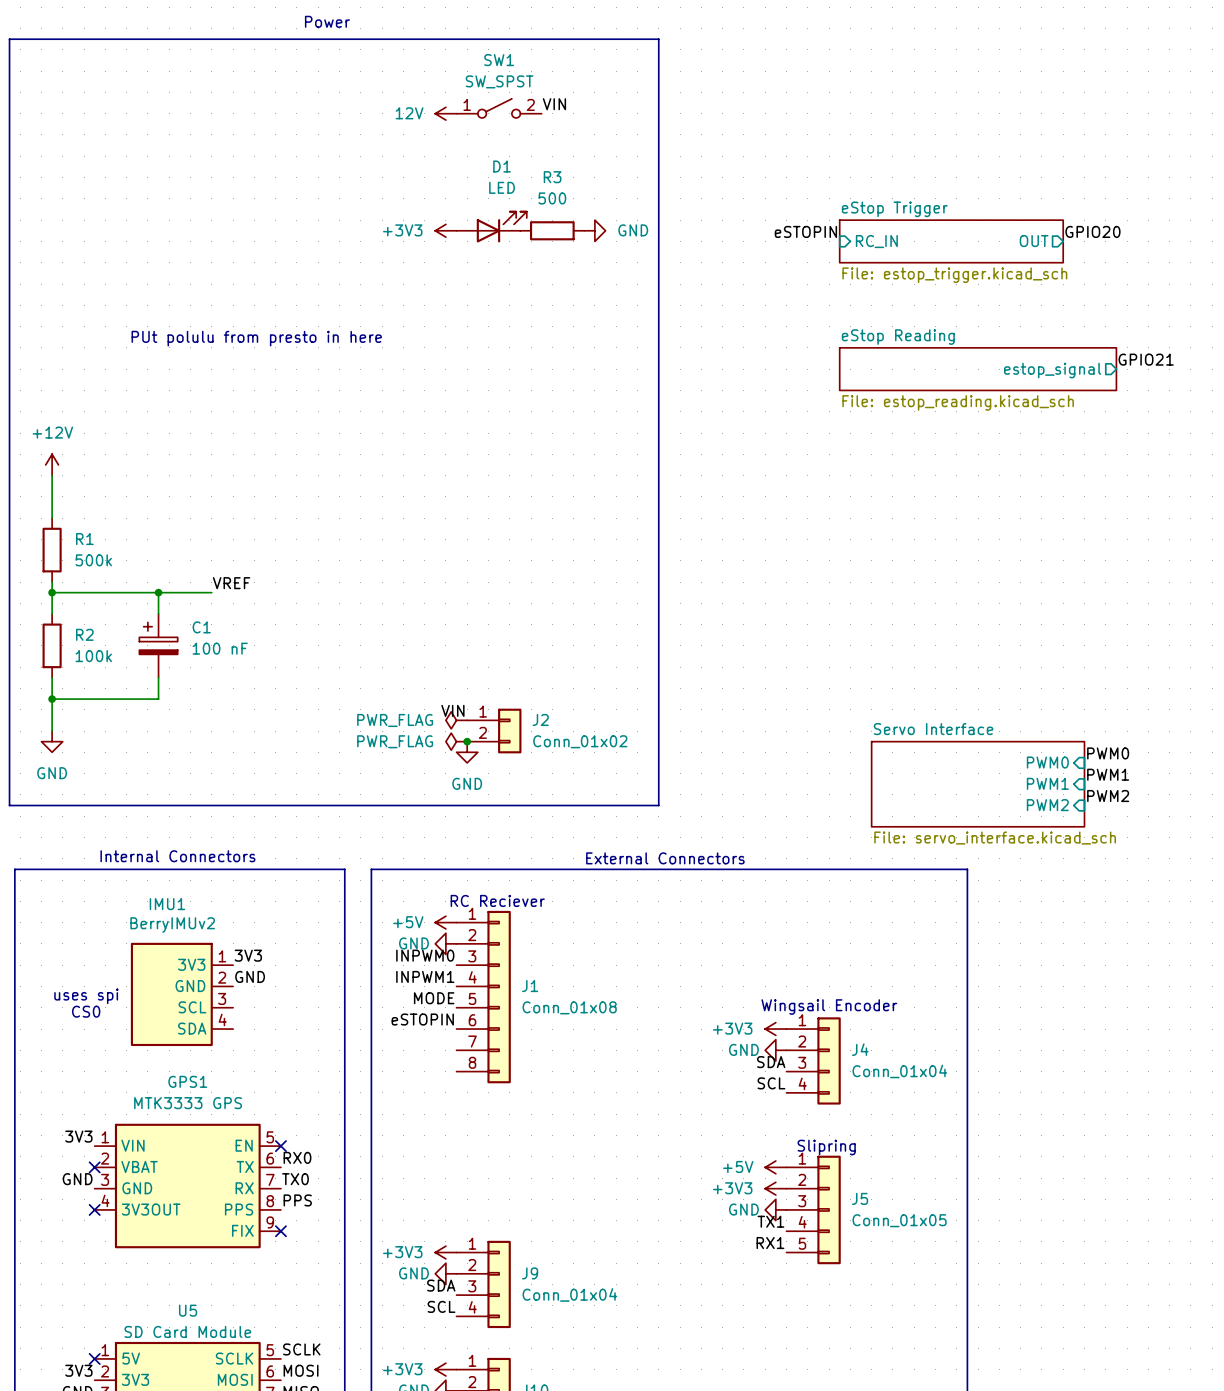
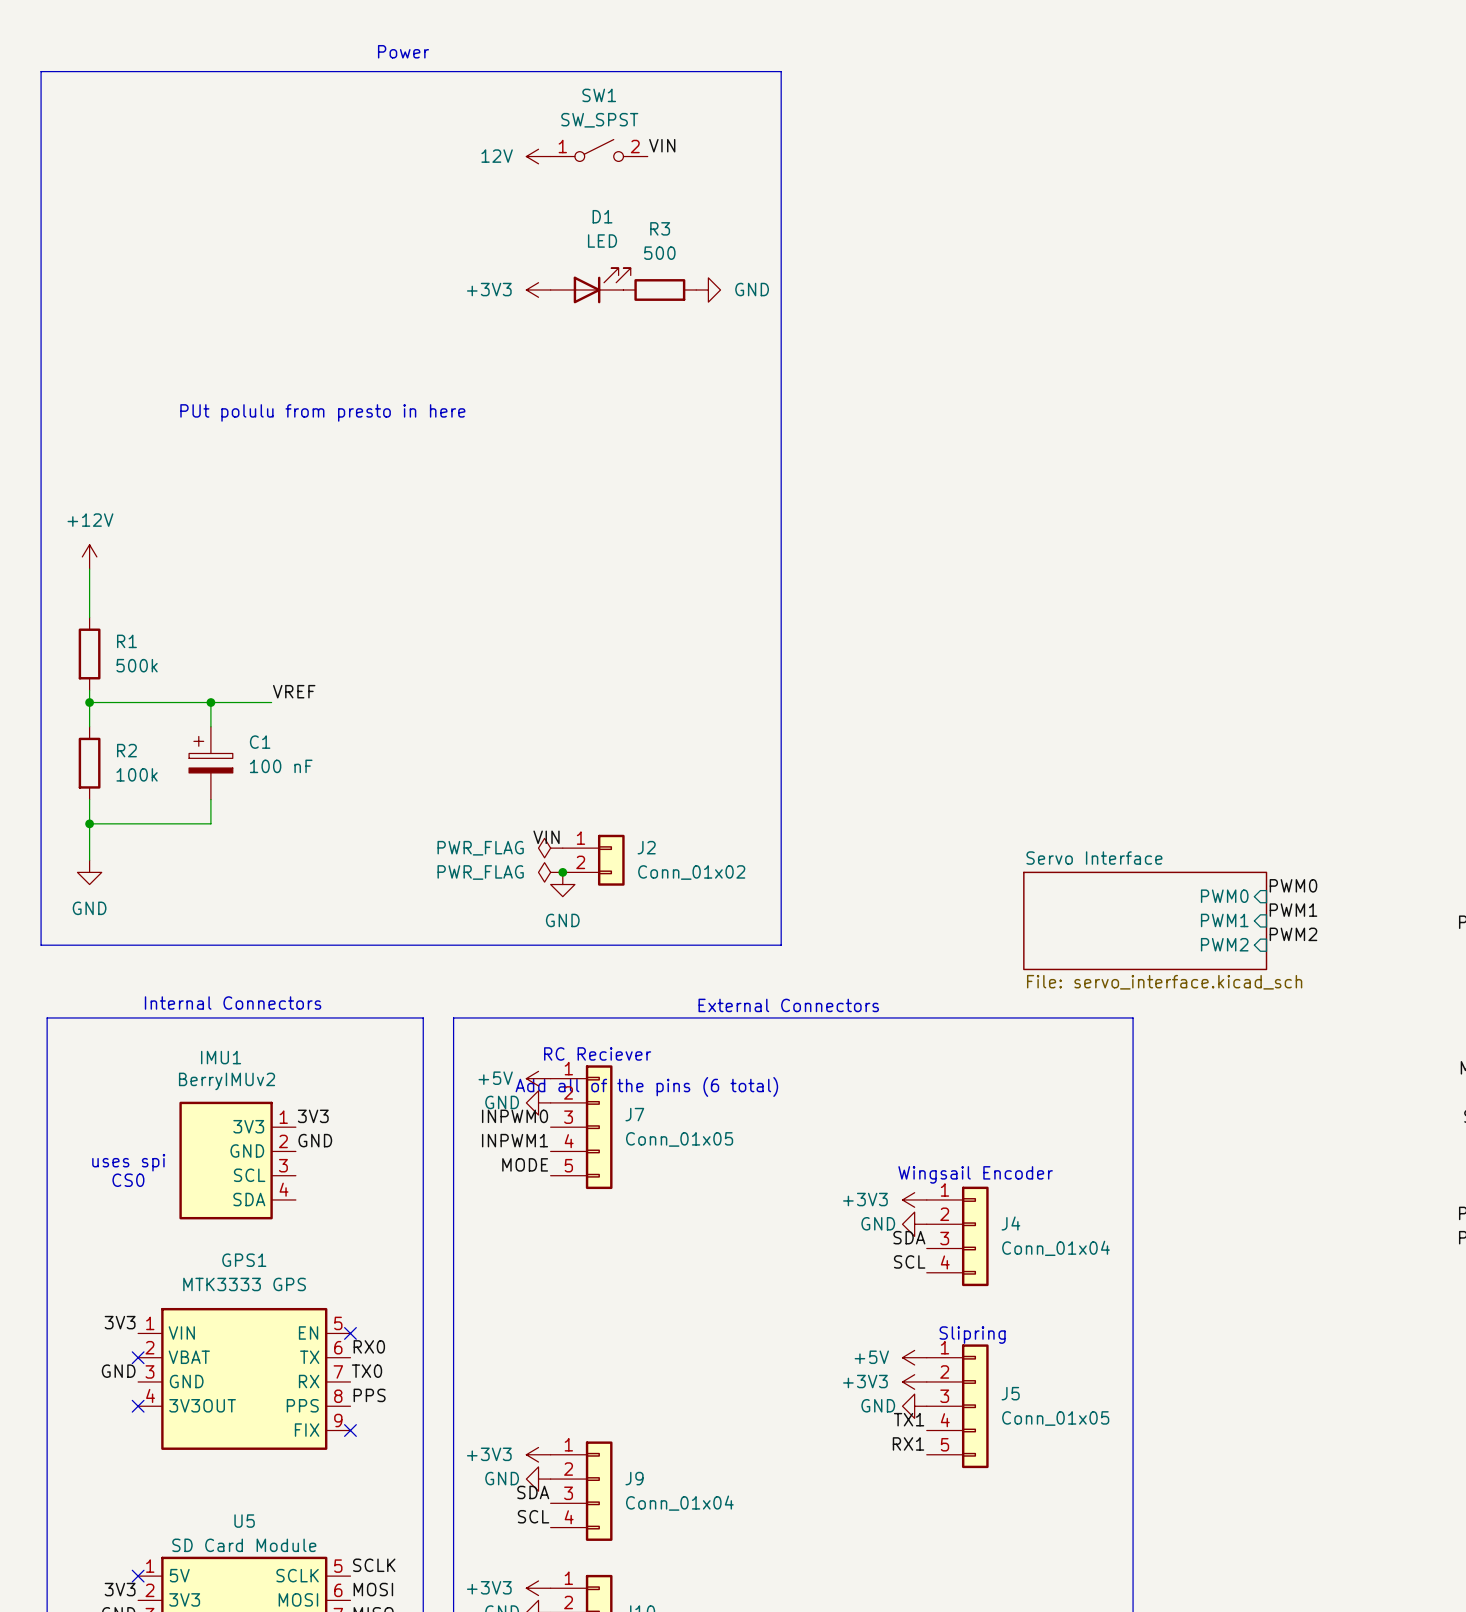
label: eSTOPIN (805, 231) -> none
label: GPIO20 (1092, 231) -> none
sheet pin: RC_IN (876, 241) -> none
sheet eStop Trigger: File: estop_trigger.kicad_sch (951, 241) -> none
sheet pin: OUT (1034, 241) -> none
label: GPIO21 (1146, 359) -> none
sheet eStop Reading: File: estop_reading.kicad_sch (978, 369) -> none
sheet pin: estop_signal (1052, 370) -> none
text: none -> Add all of the pins (6 total) (646, 1086)
J7: none -> Conn_01x05 (581, 1127)
J1: Conn_01x08 (483, 997) -> none
label: eSTOPIN (422, 1019) -> none

